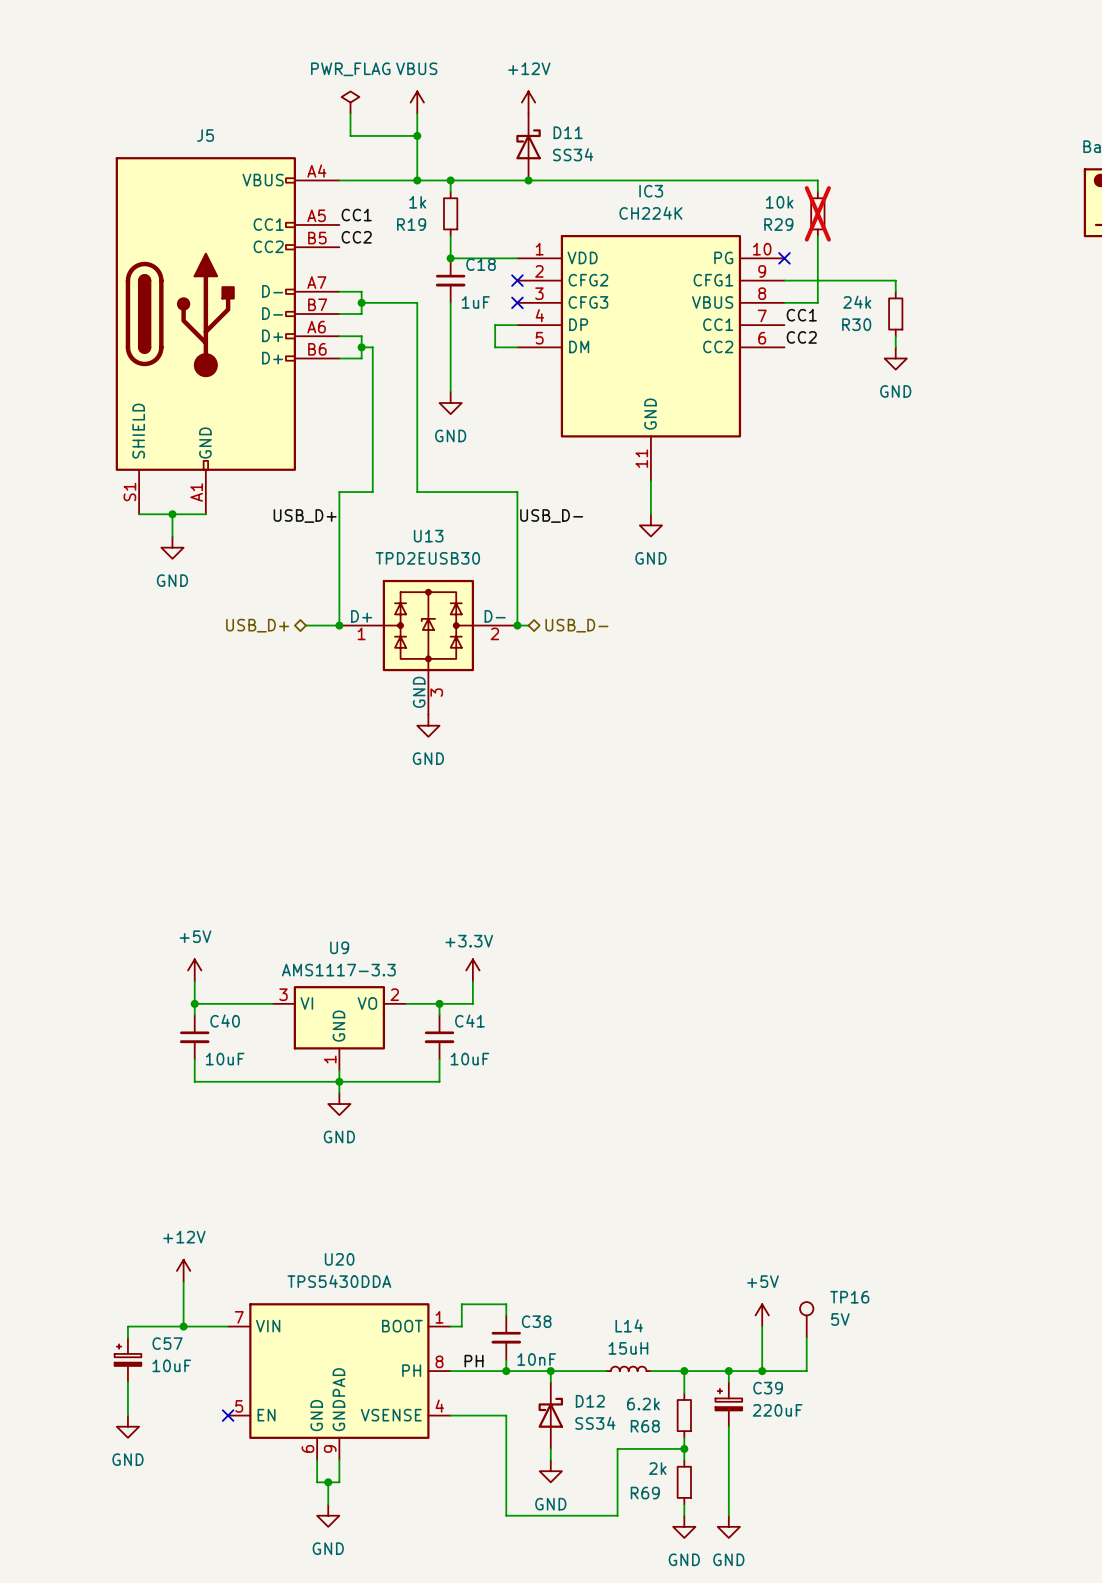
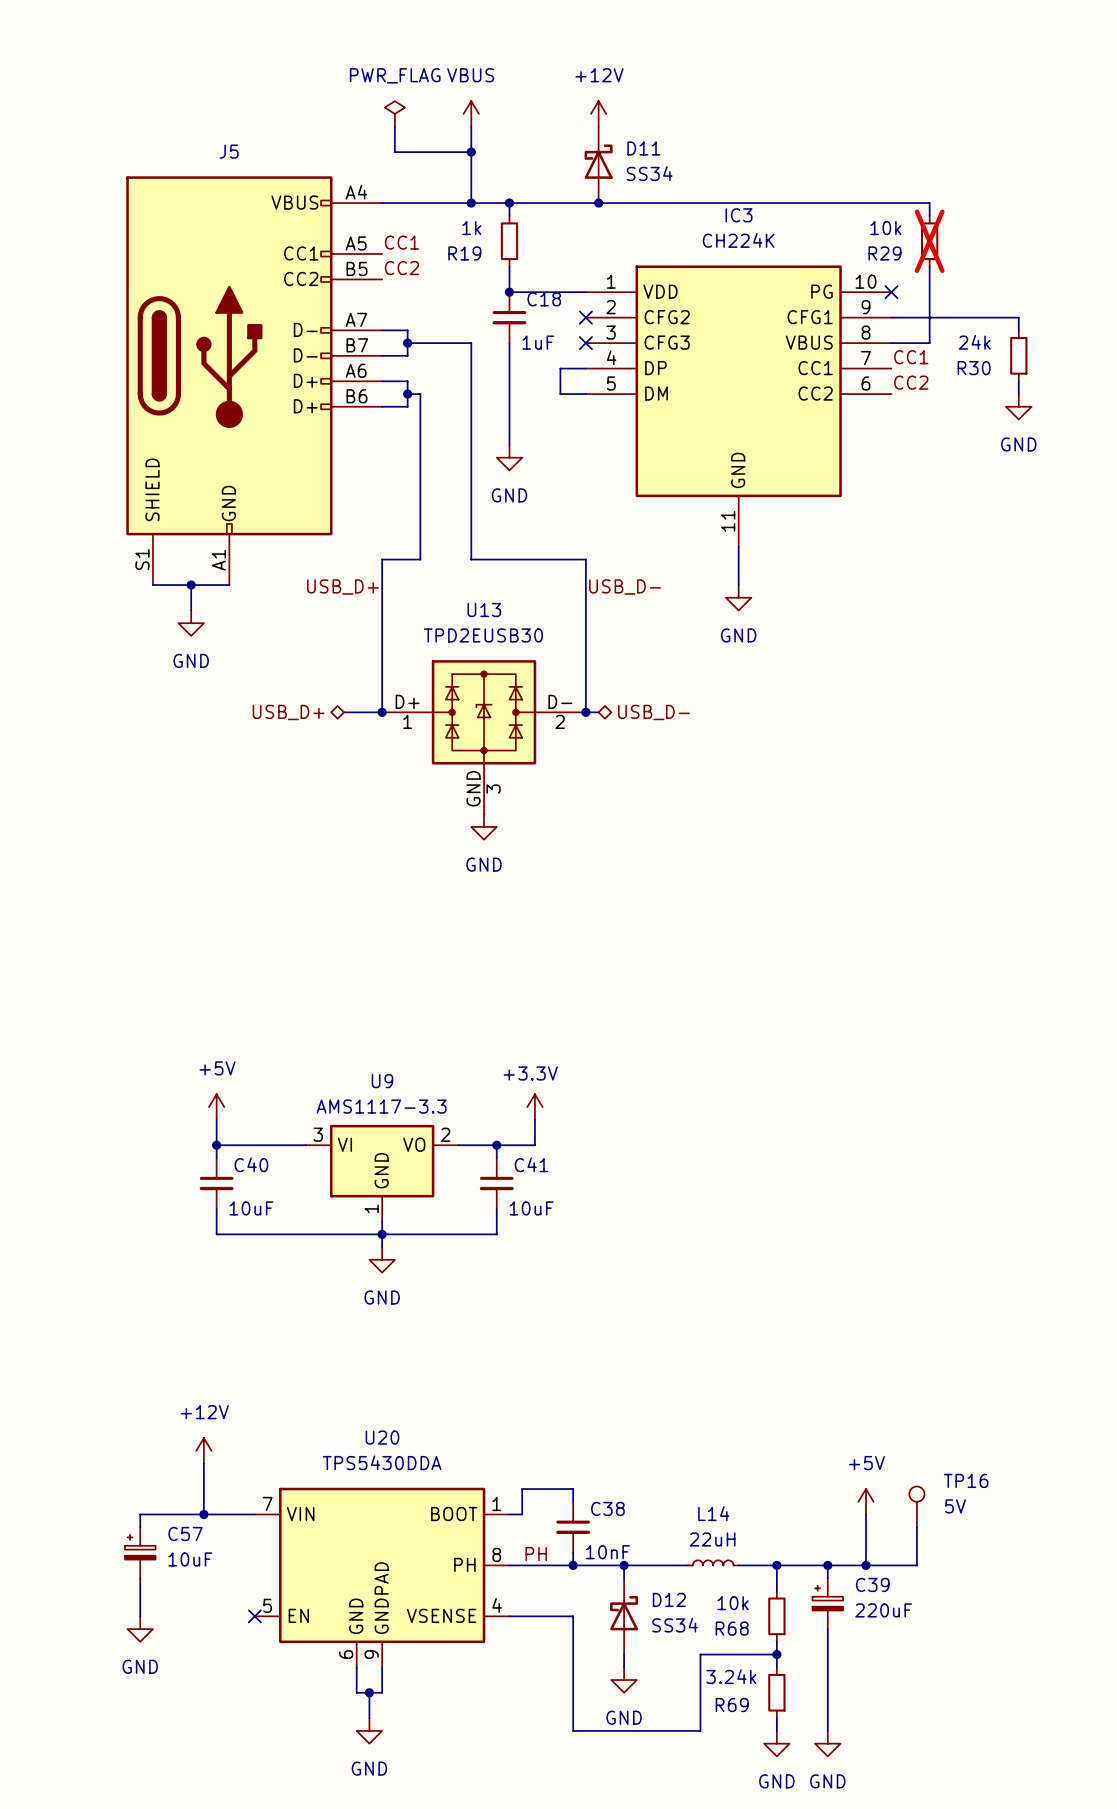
L14 value: 15uH (628, 1348) -> 22uH (712, 1539)
R68 value: 6.2k (643, 1404) -> 10k (733, 1603)
R69 value: 2k (657, 1468) -> 3.24k (731, 1676)

